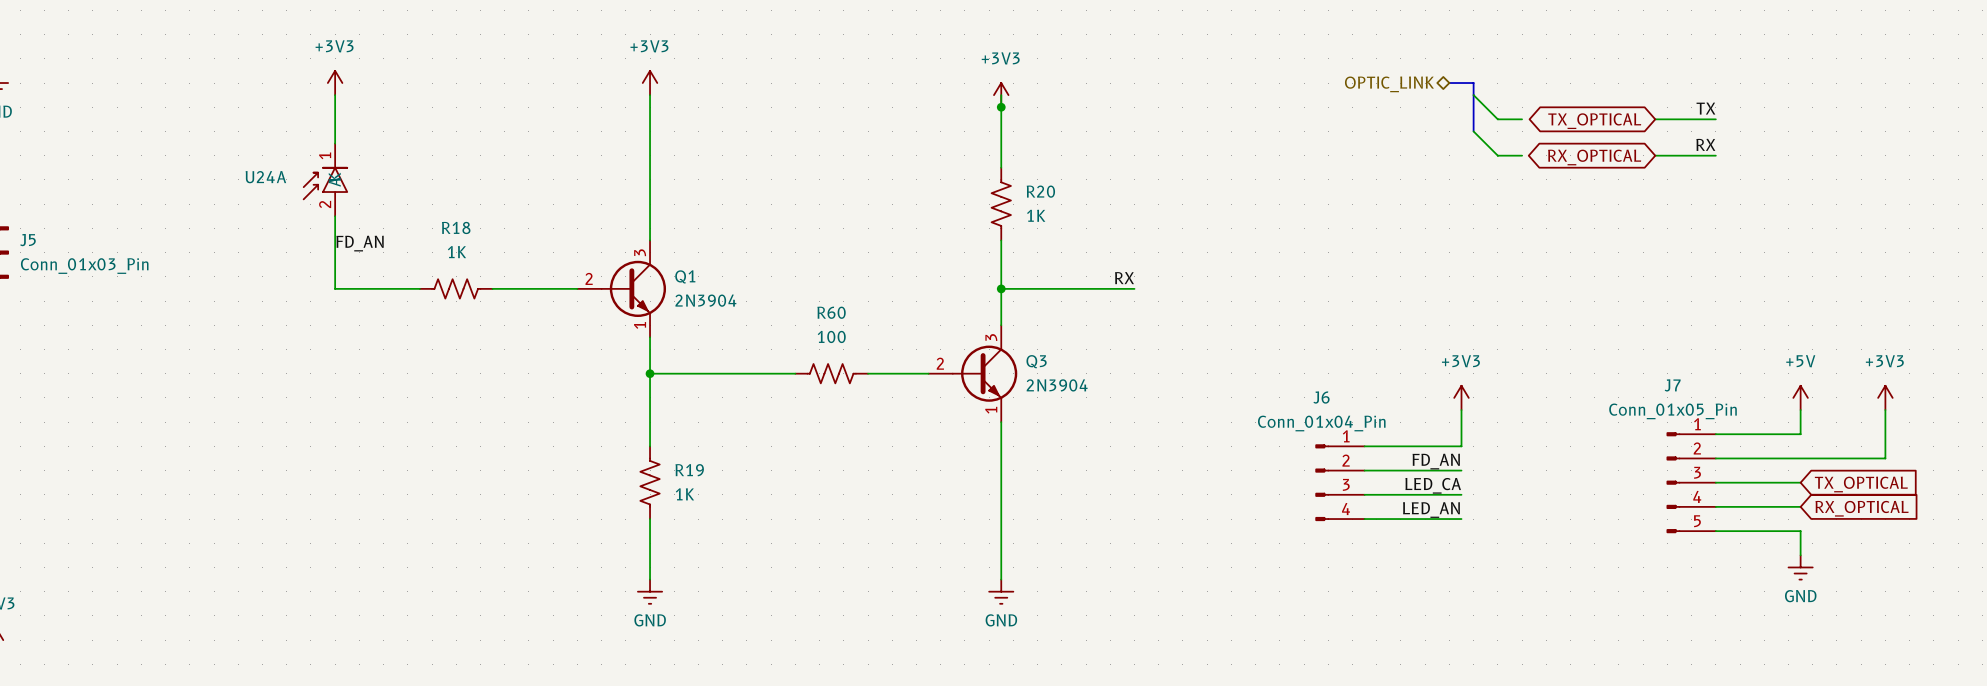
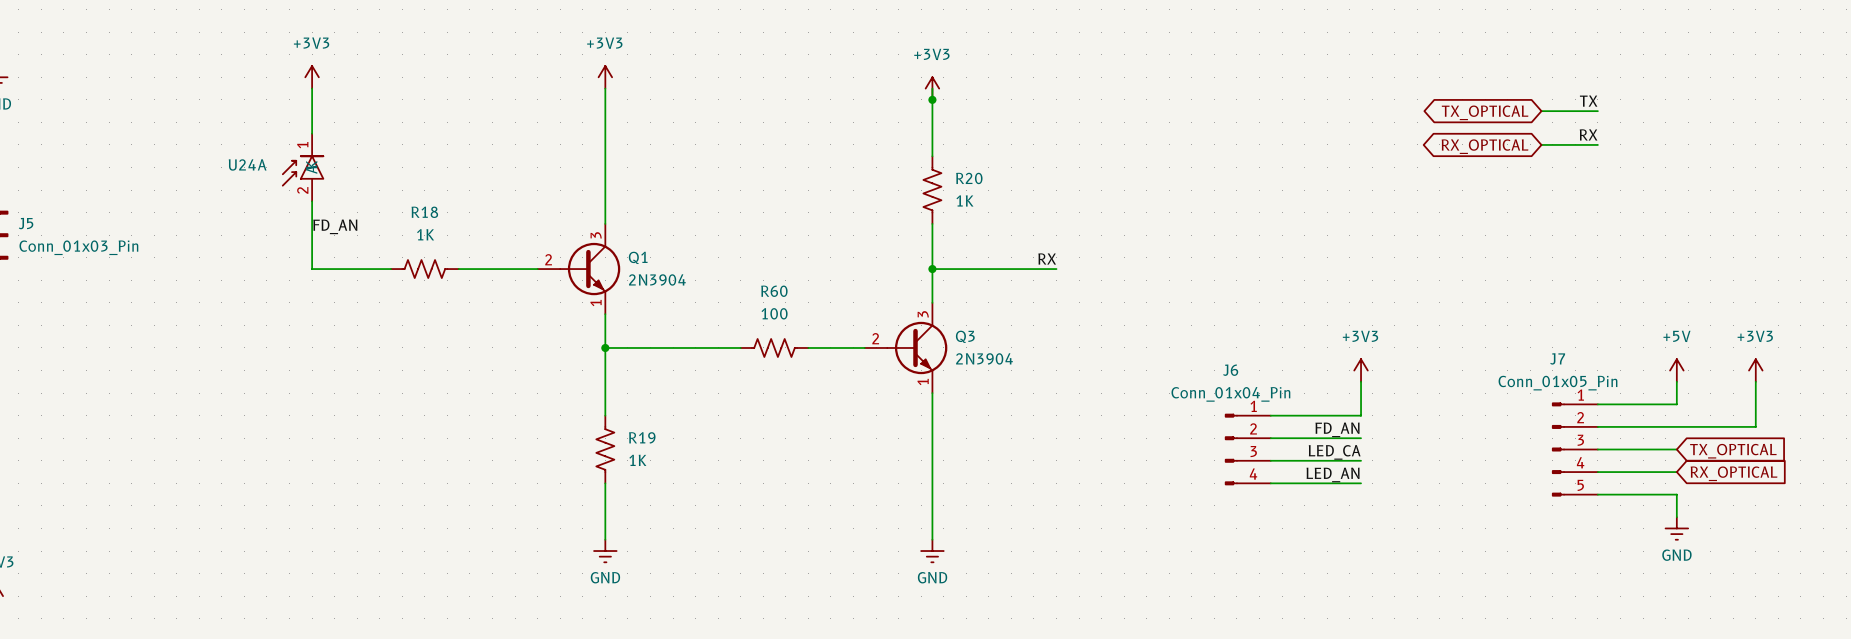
bus: (1449, 83) (1473, 83) (1473, 131) -> none
hierarchical label: OPTIC_LINK (1389, 84) -> none
wire: (1473, 95) (1497, 119) (1522, 119) -> none
wire: (1473, 131) (1497, 155) (1522, 155) -> none

